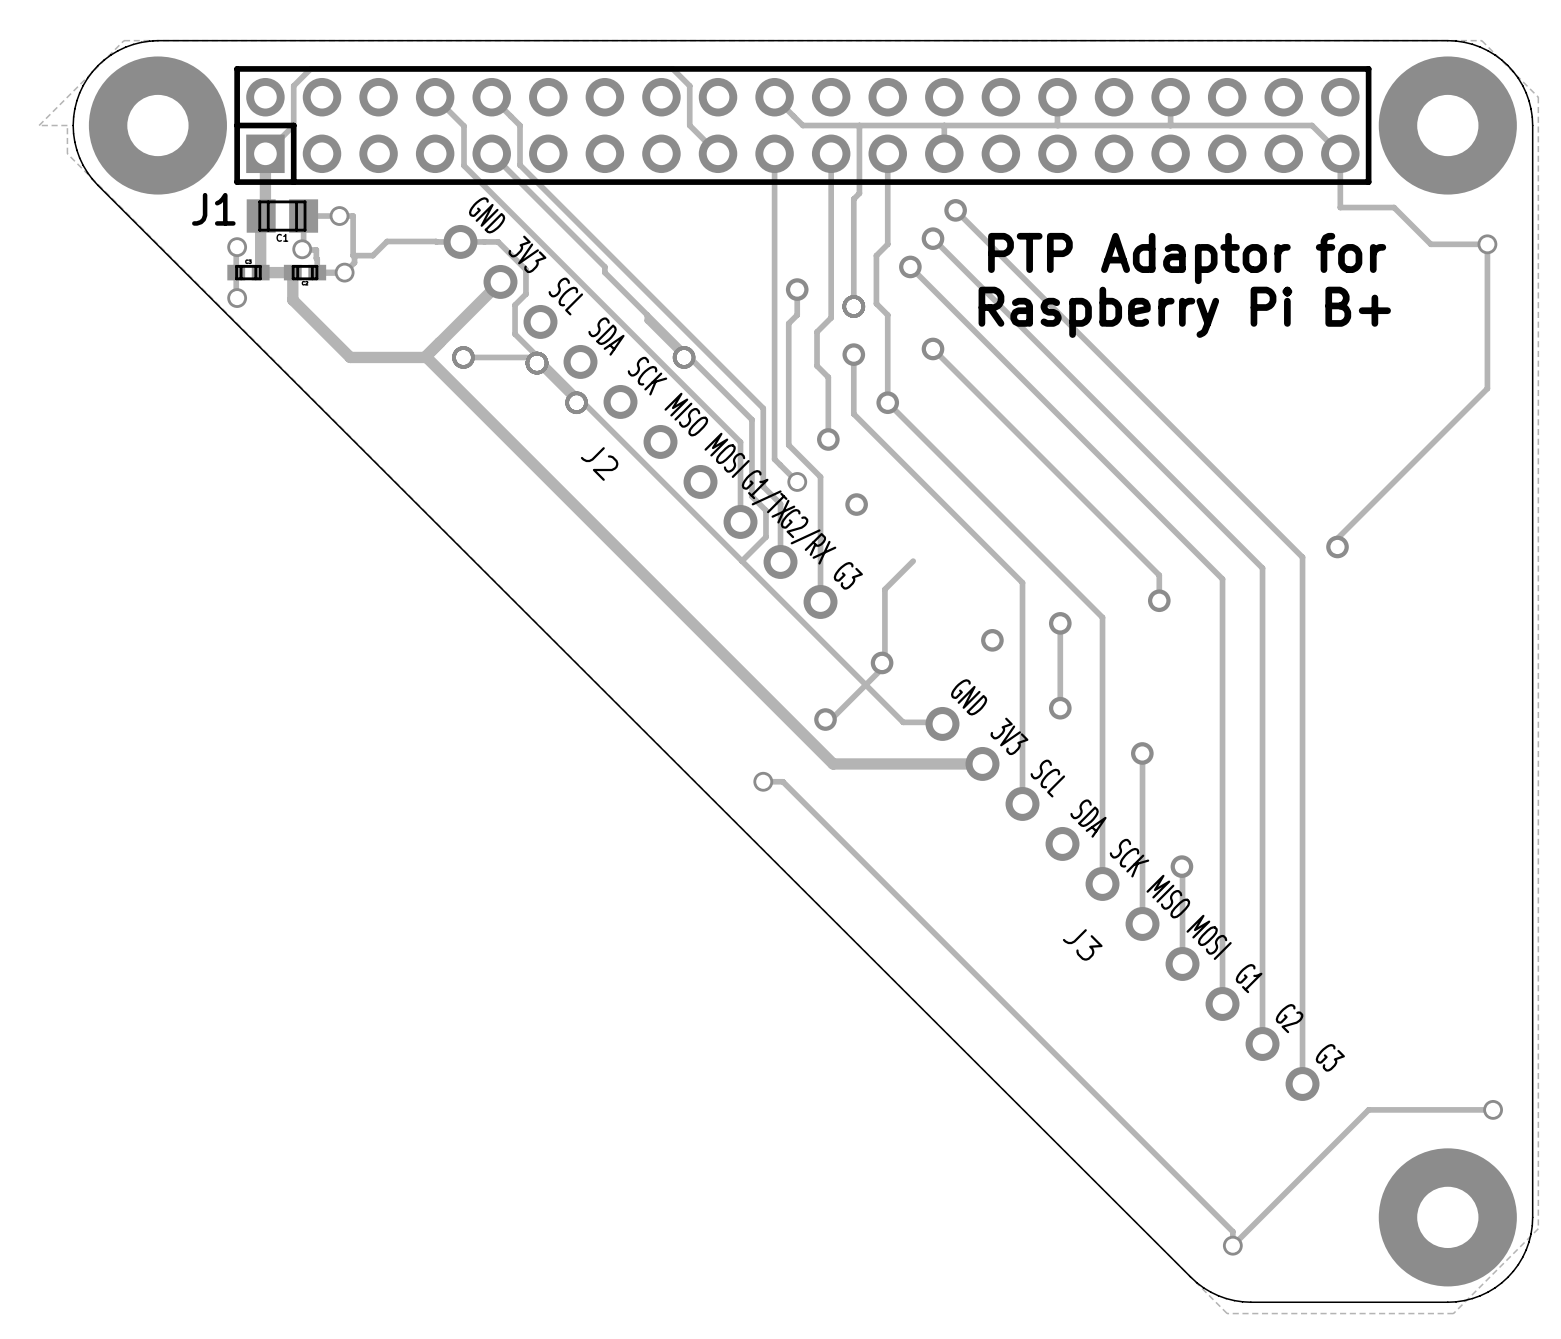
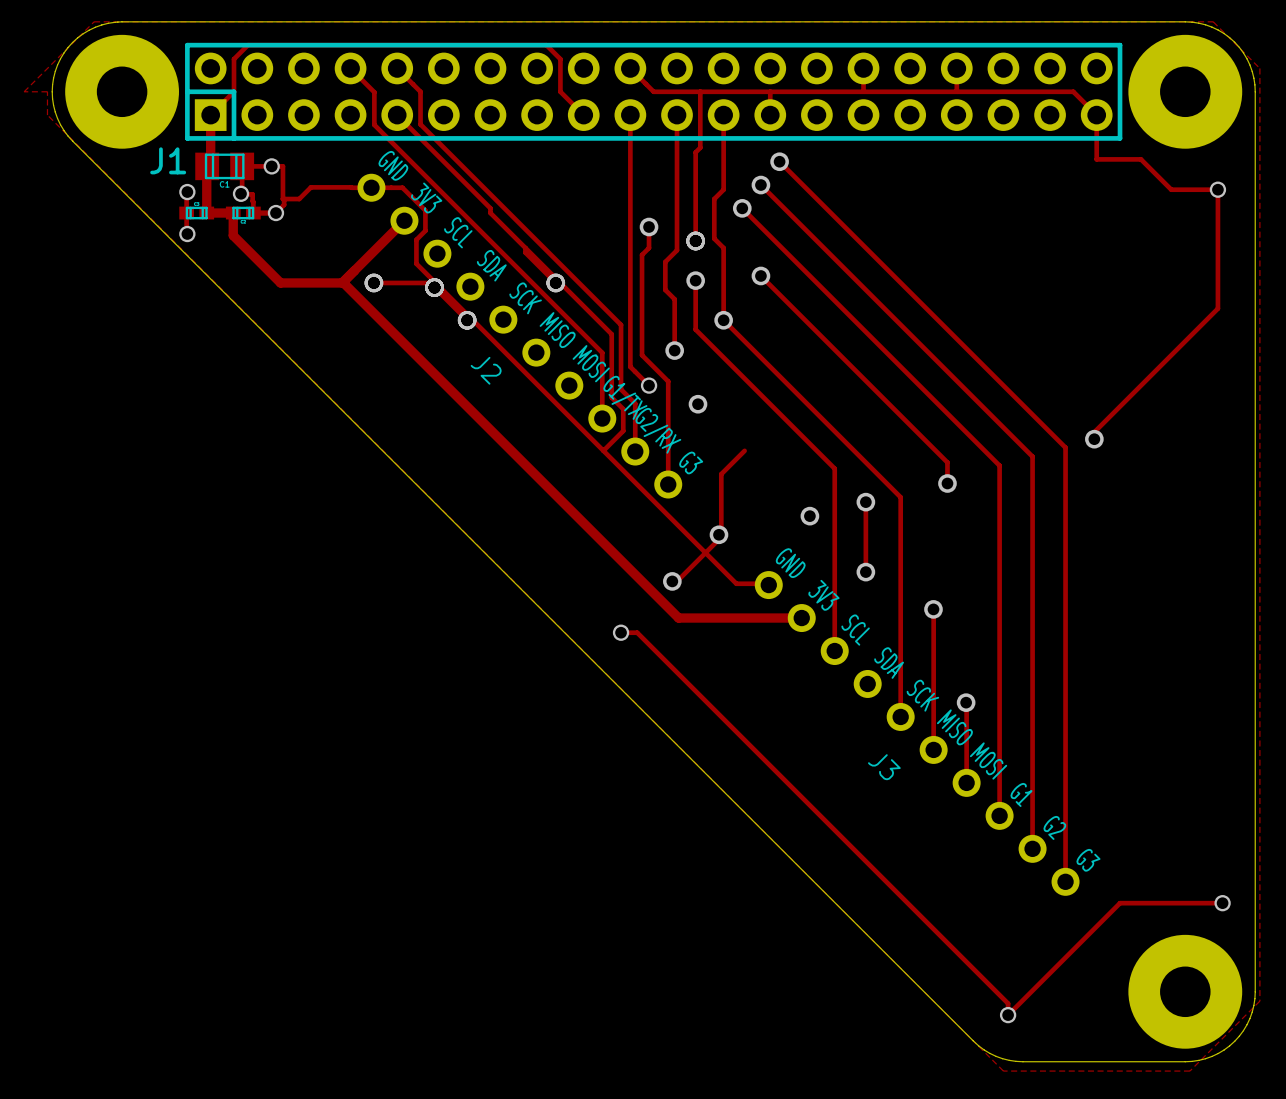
text: PTP Adaptor for (1187, 258) -> none
text: Raspberry Pi B+ (1184, 312) -> none

